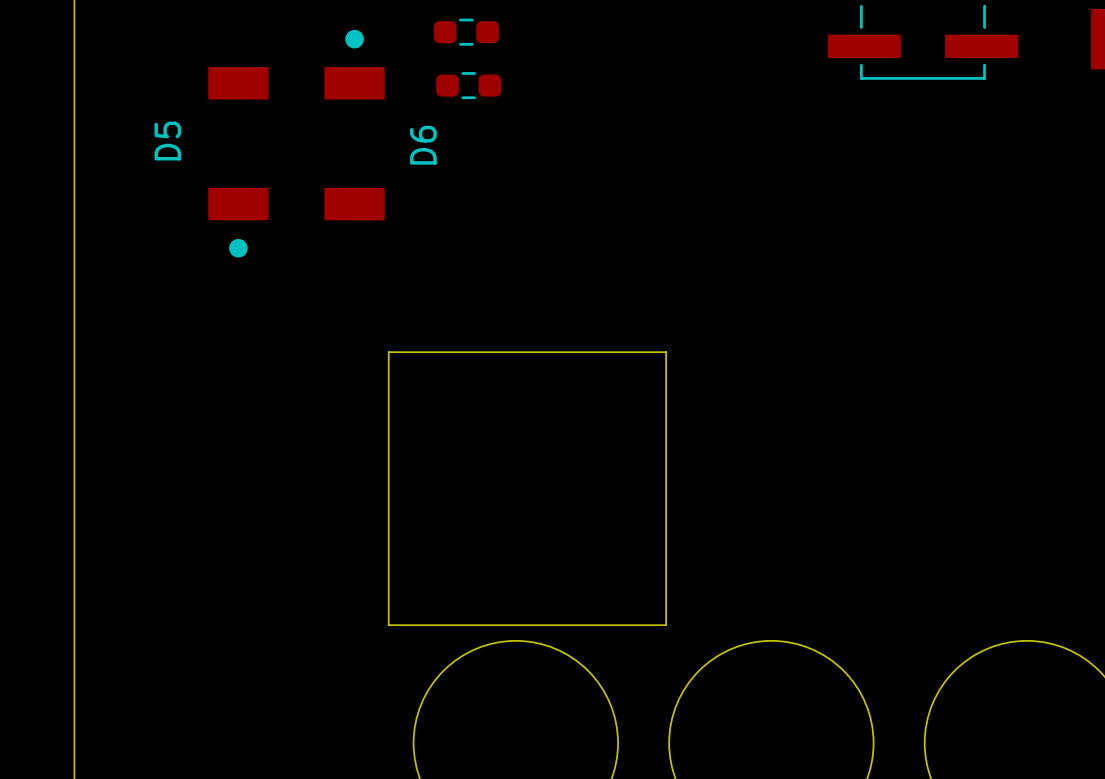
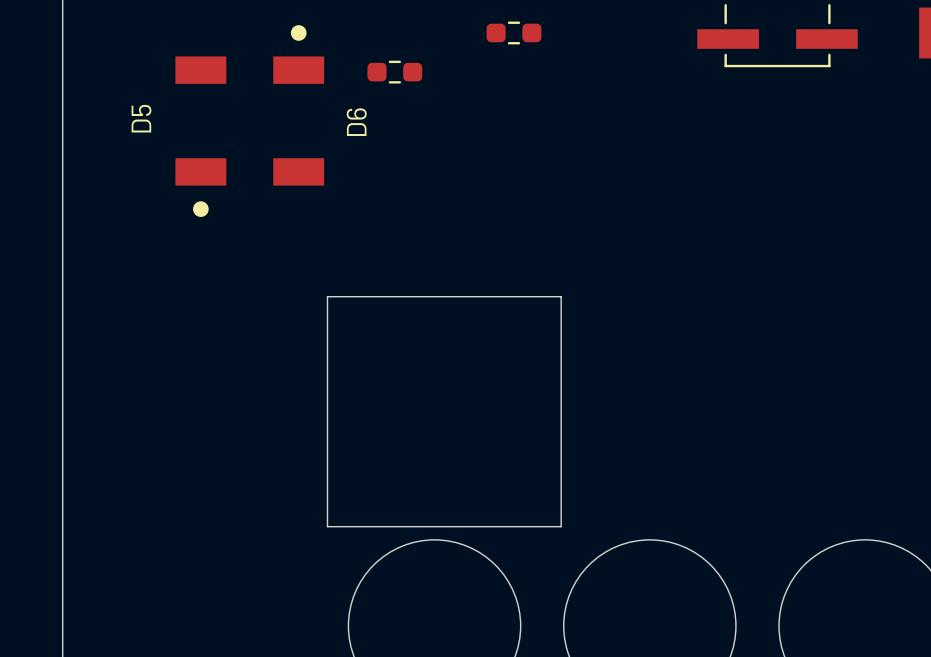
part position: (466, 32) -> (514, 32)

